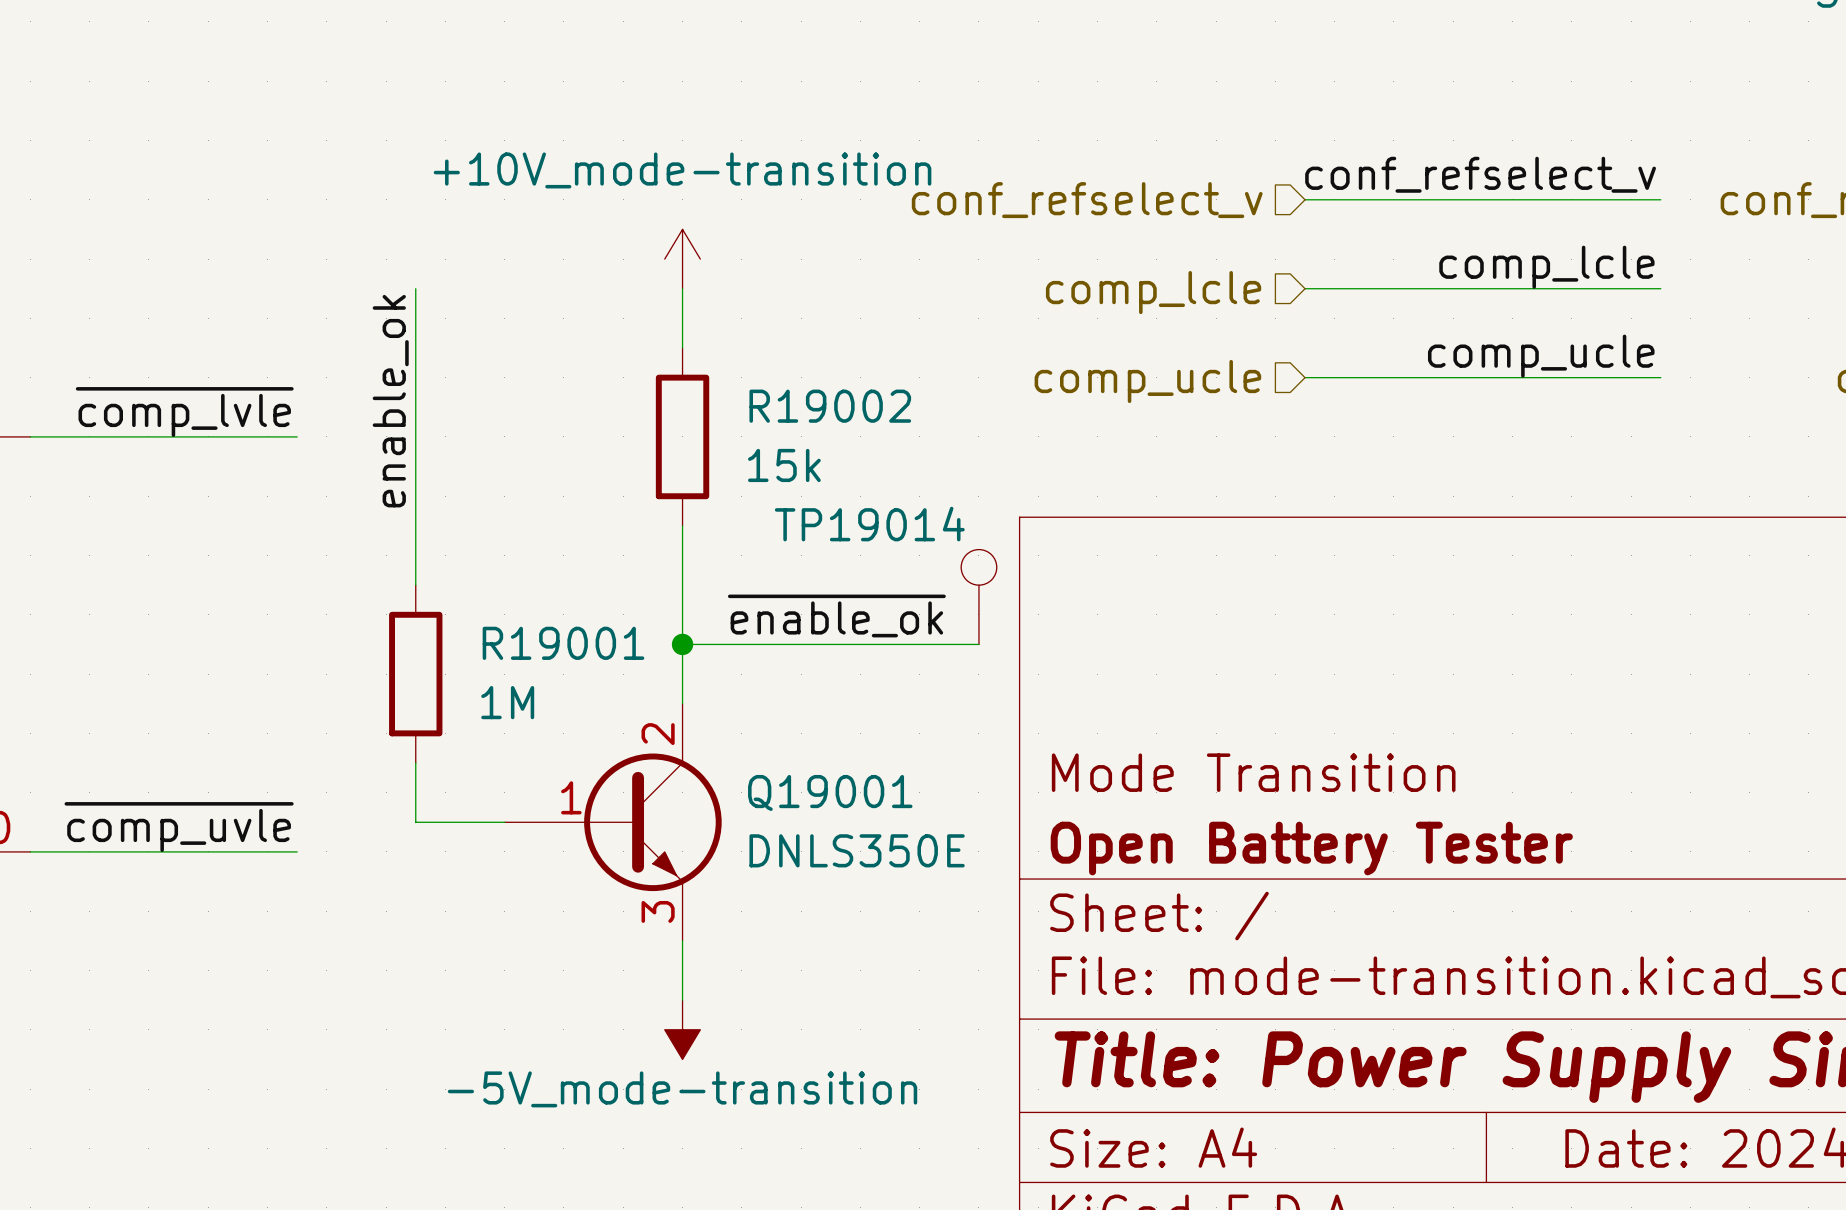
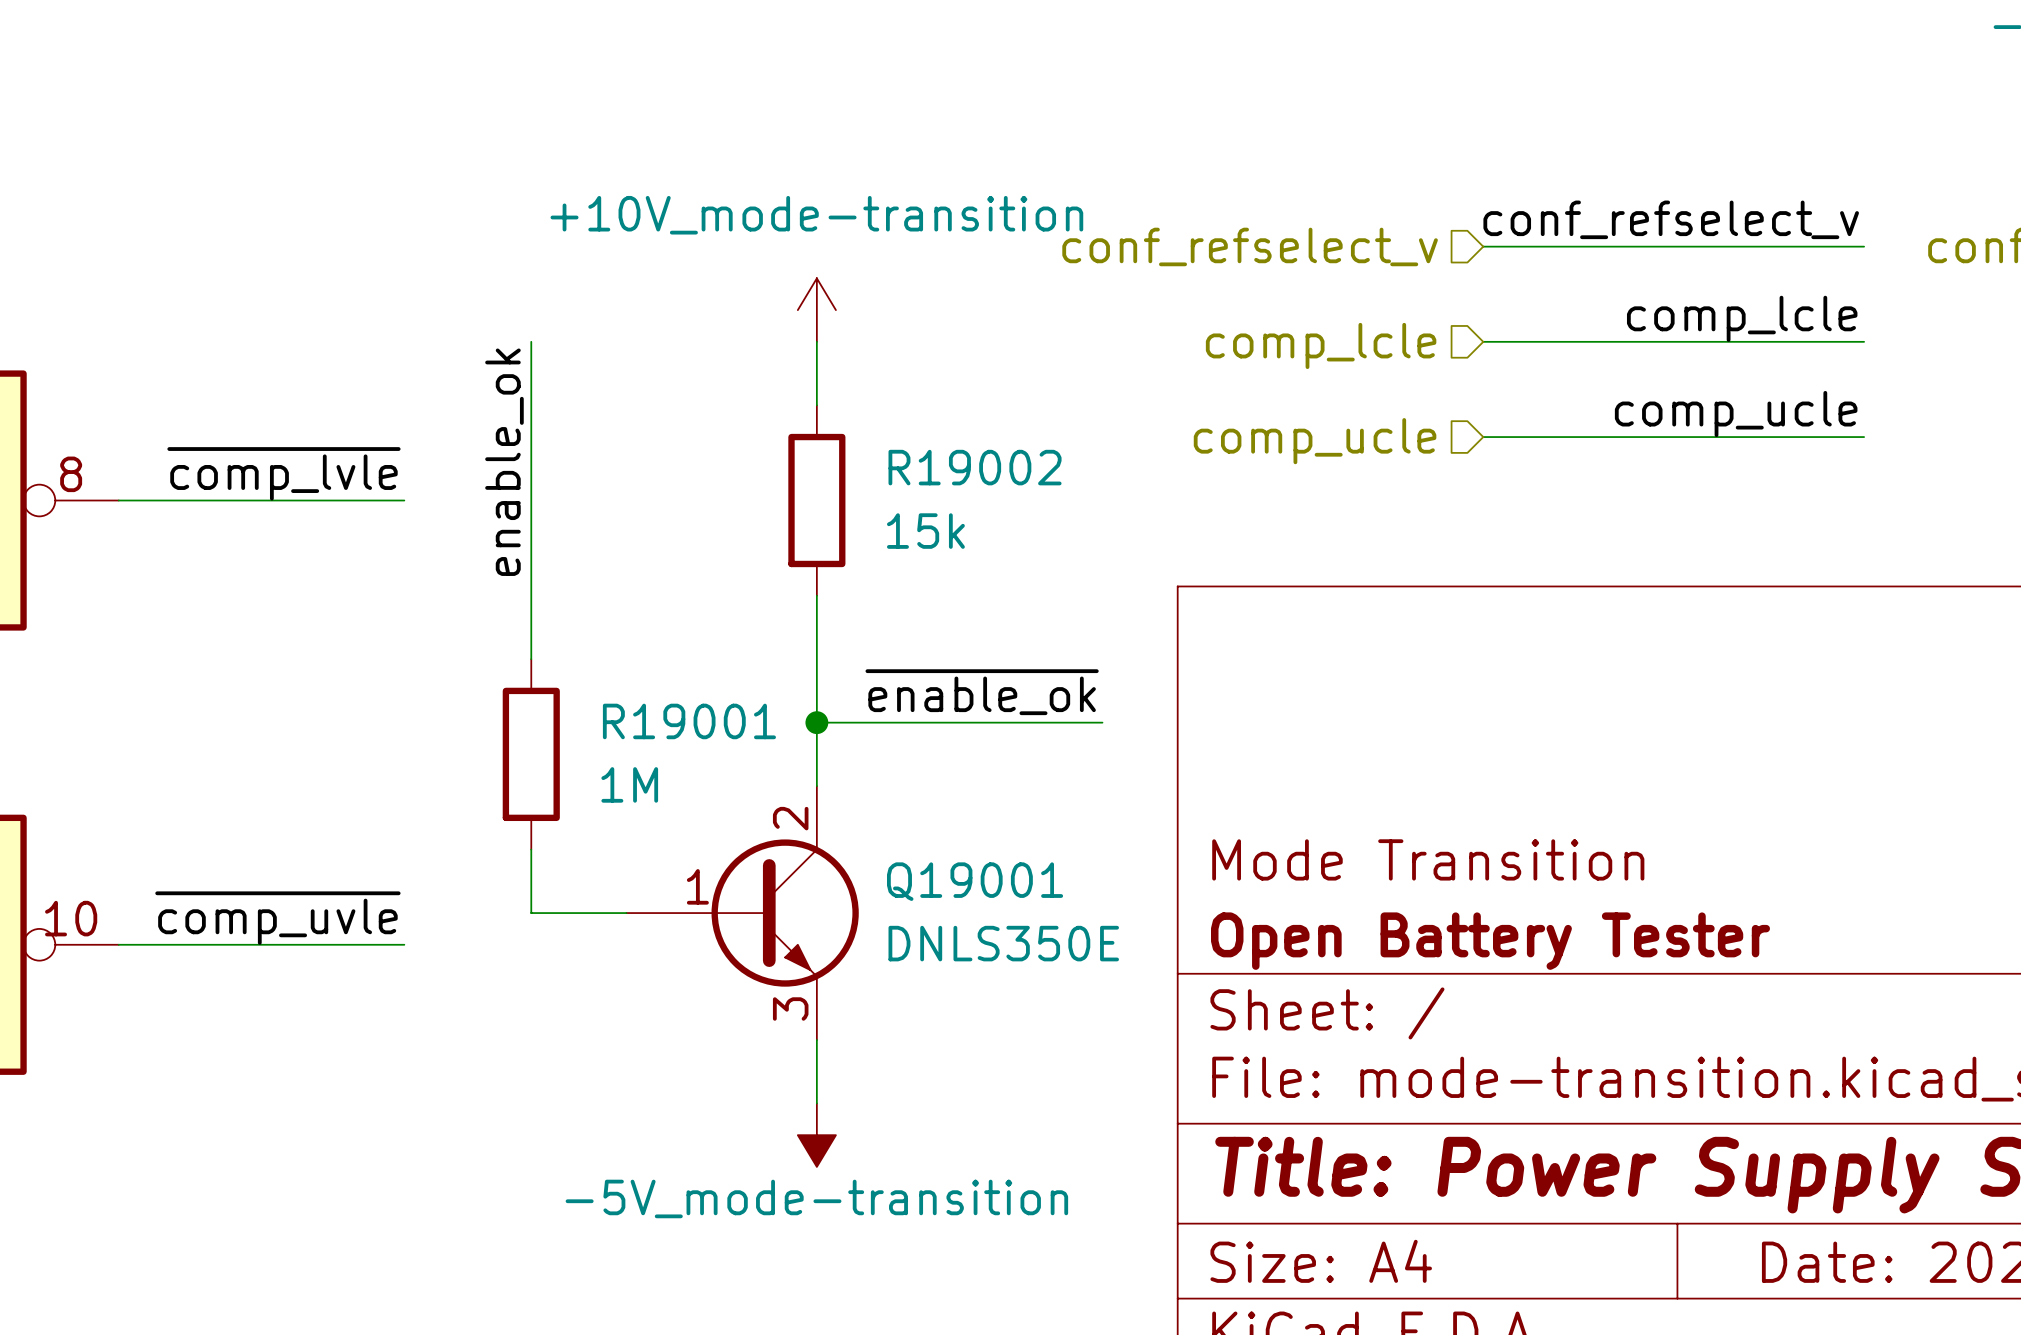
TP19014: (978, 597) -> none
wire: (949, 644) (978, 644) -> none

